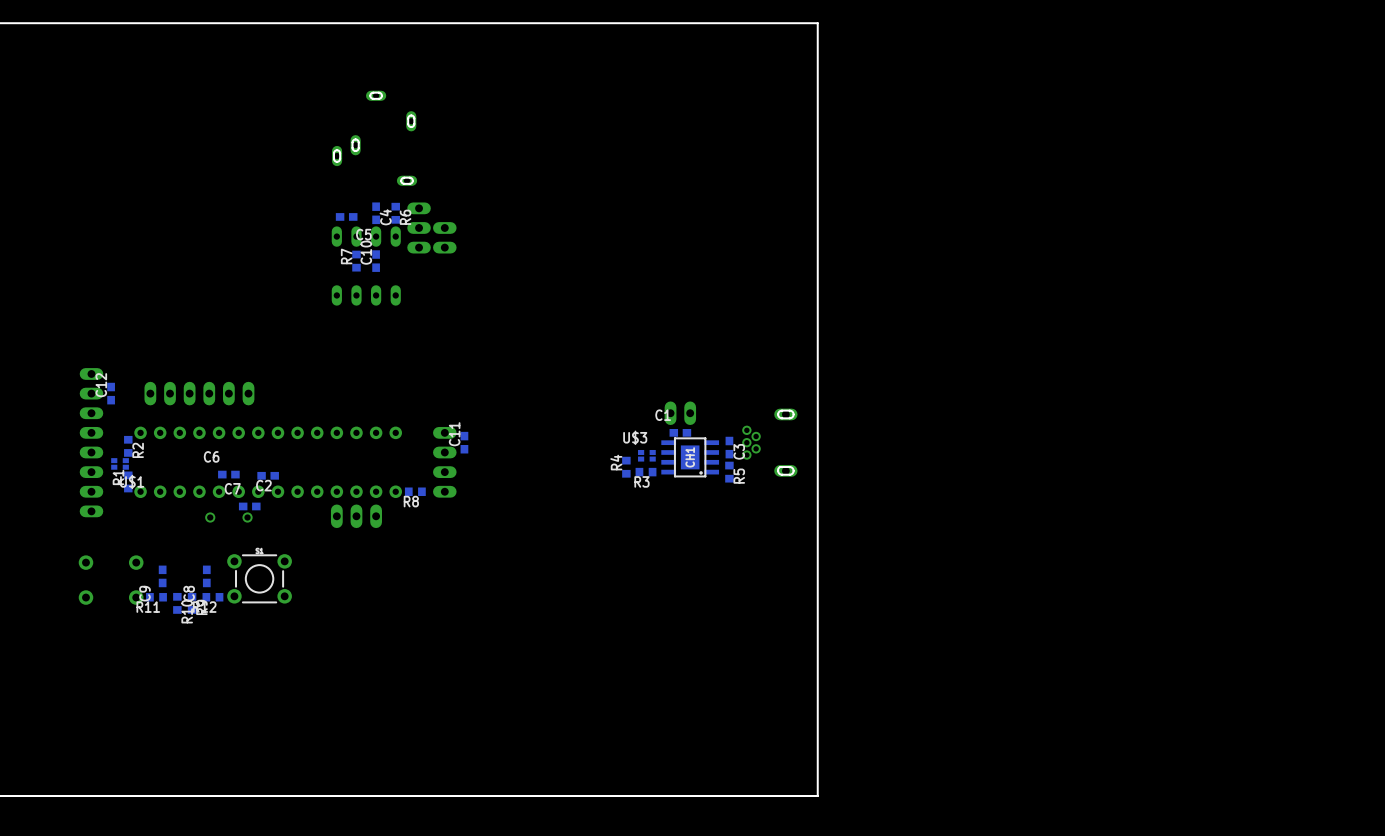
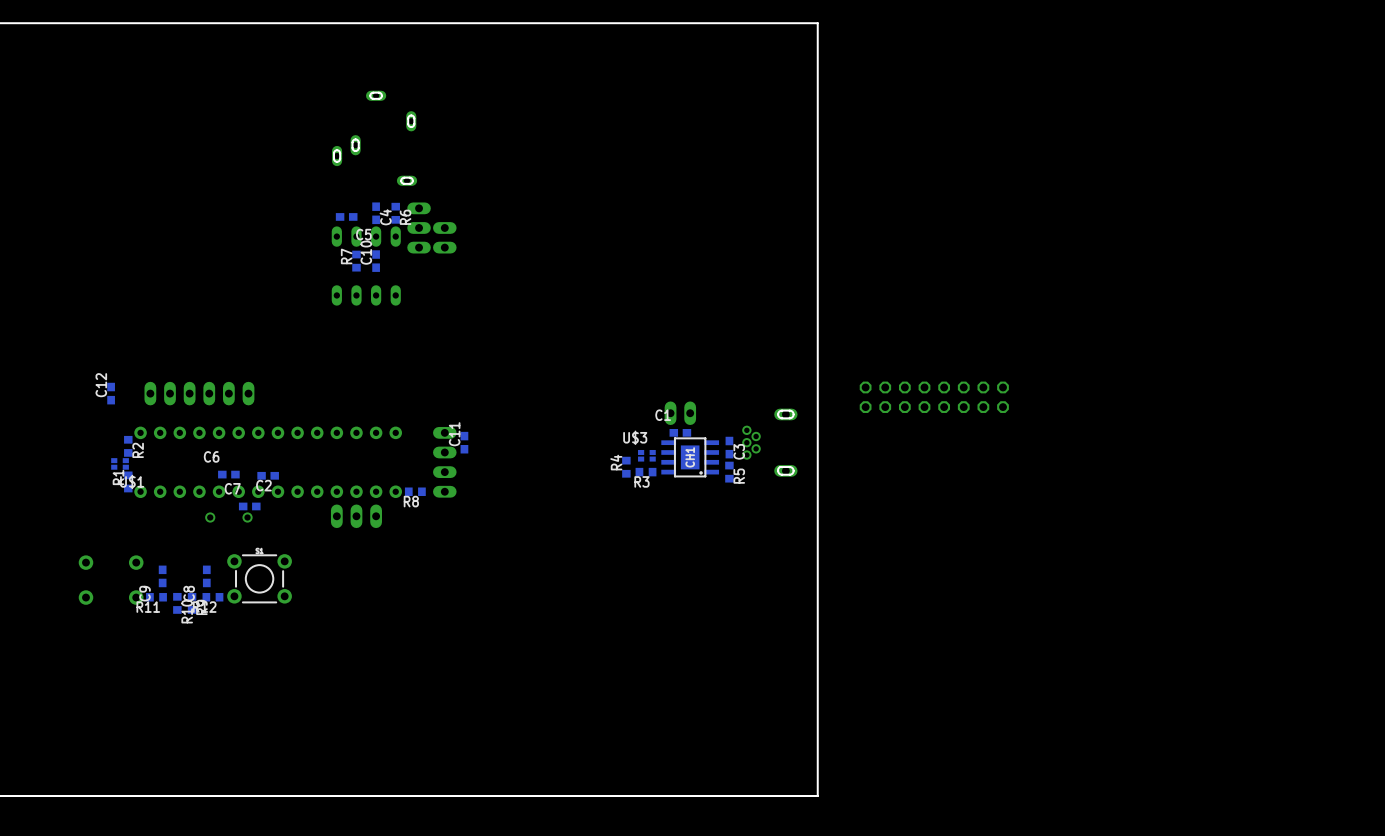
part: none -> (934, 397)
part: (91, 442) -> none

